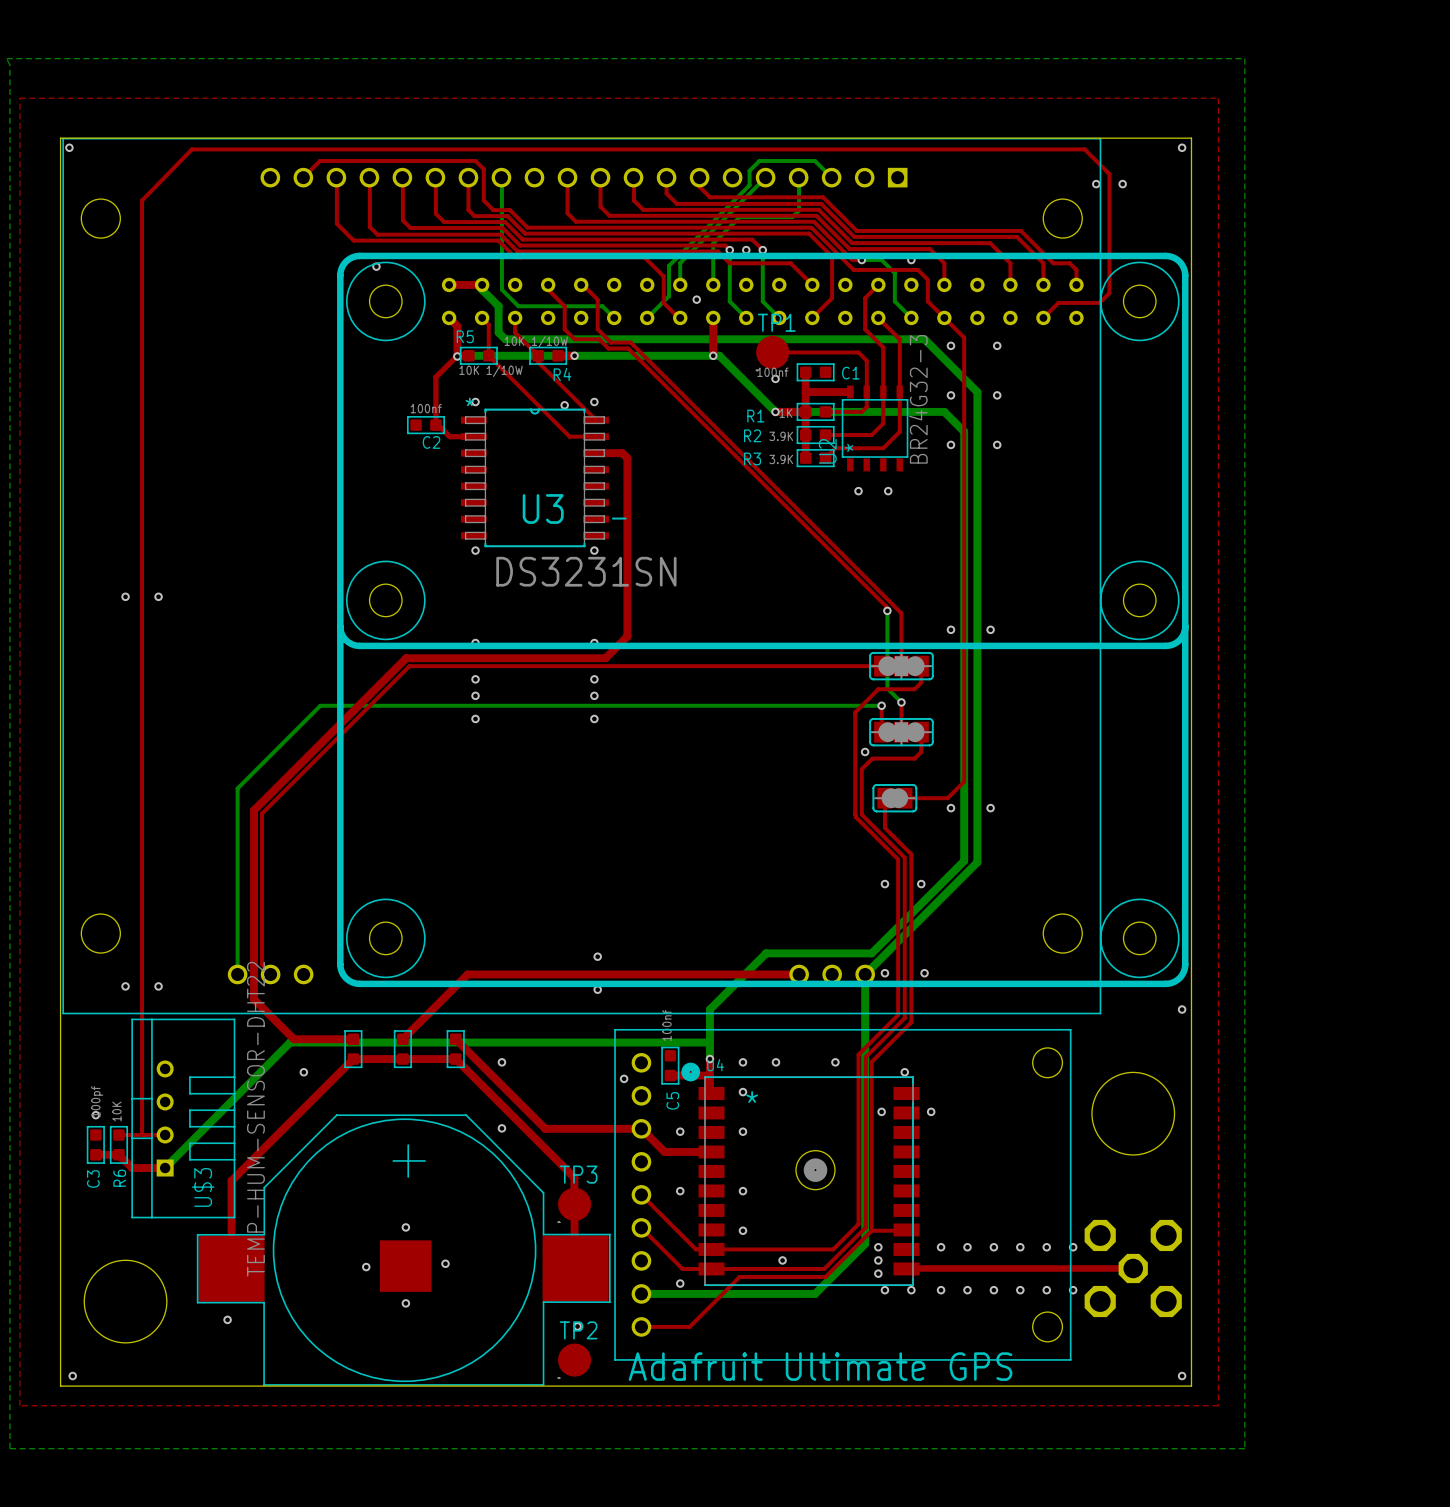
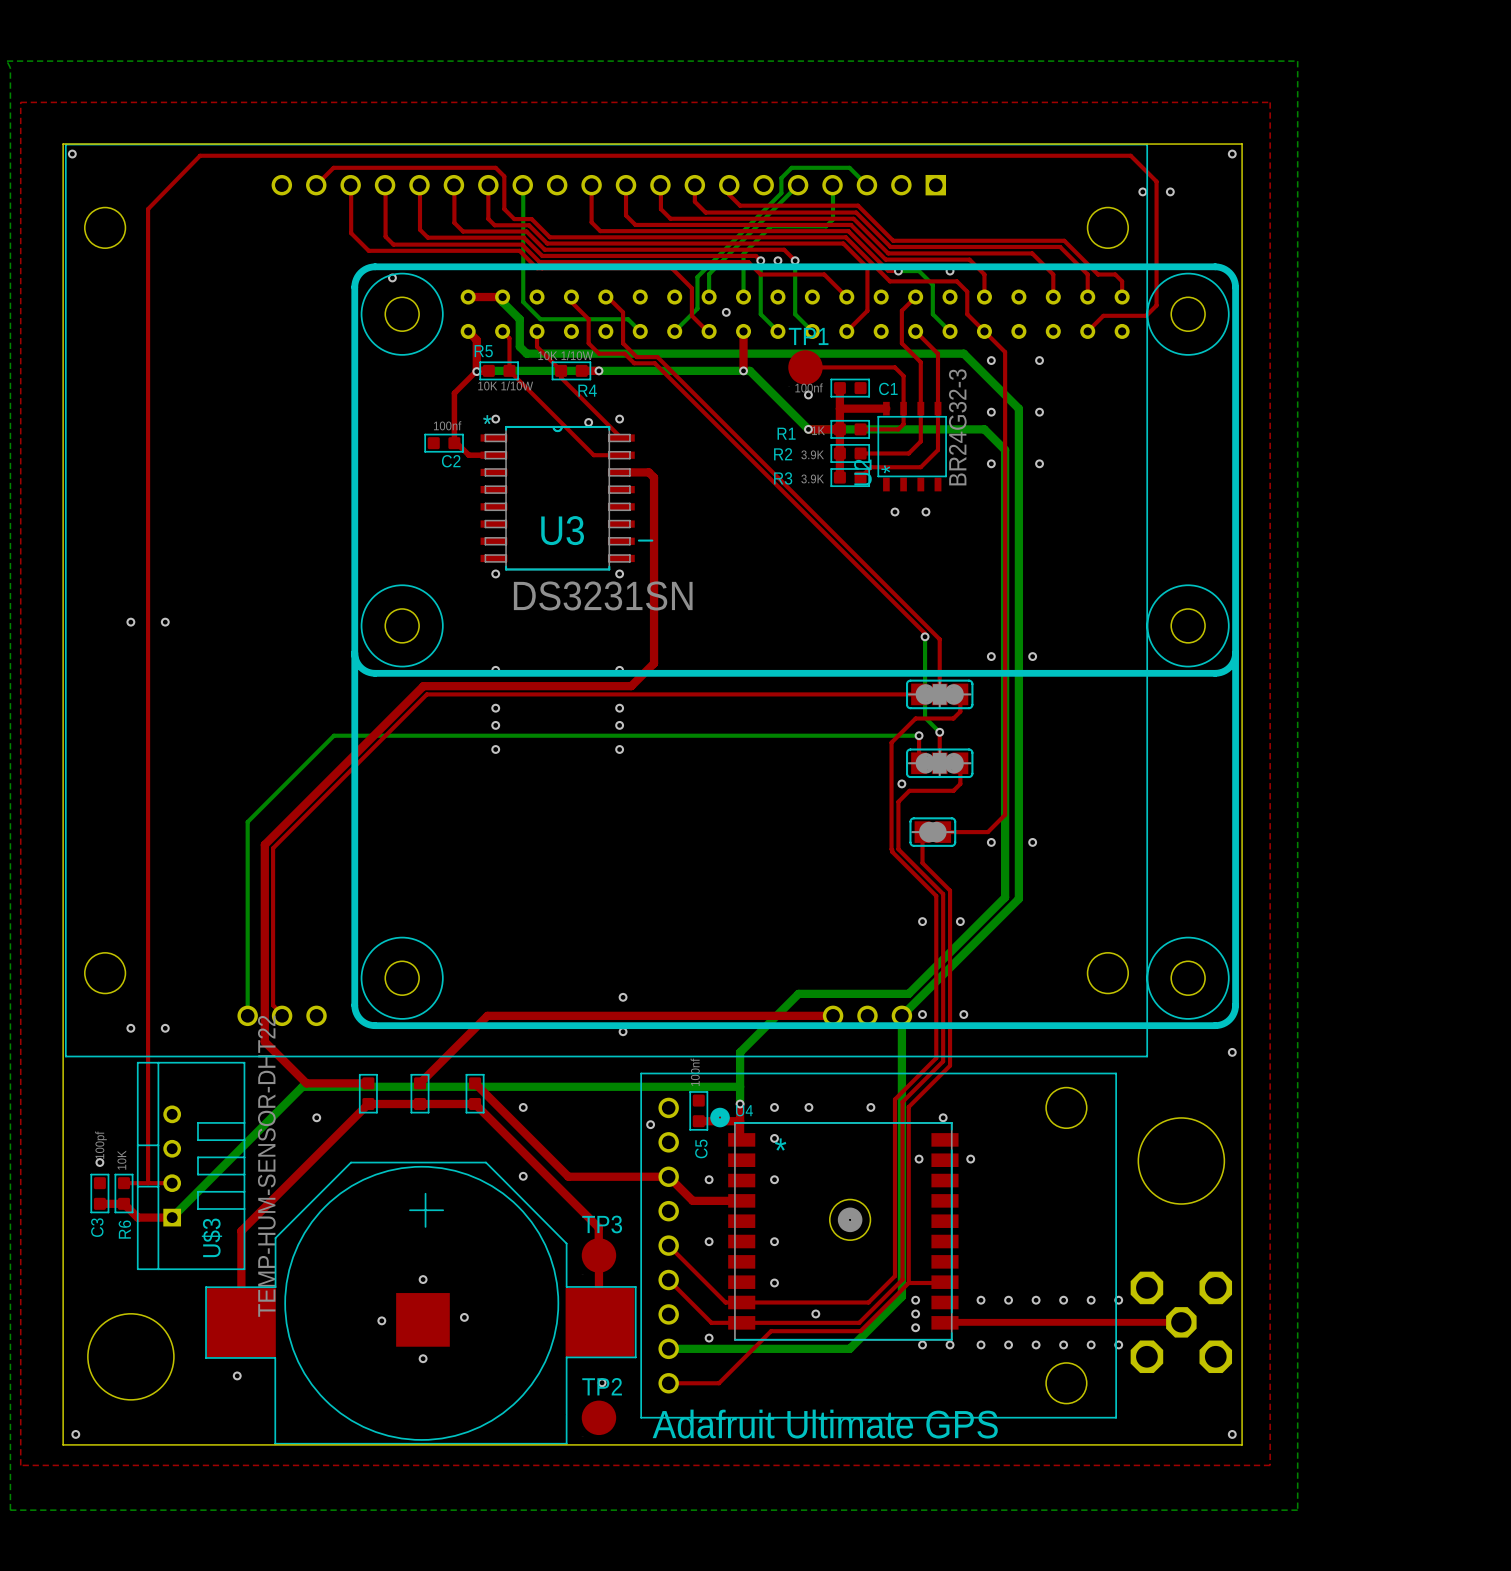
part footprint: [614, 1028, 1072, 1361] -> [640, 1072, 1117, 1419]

